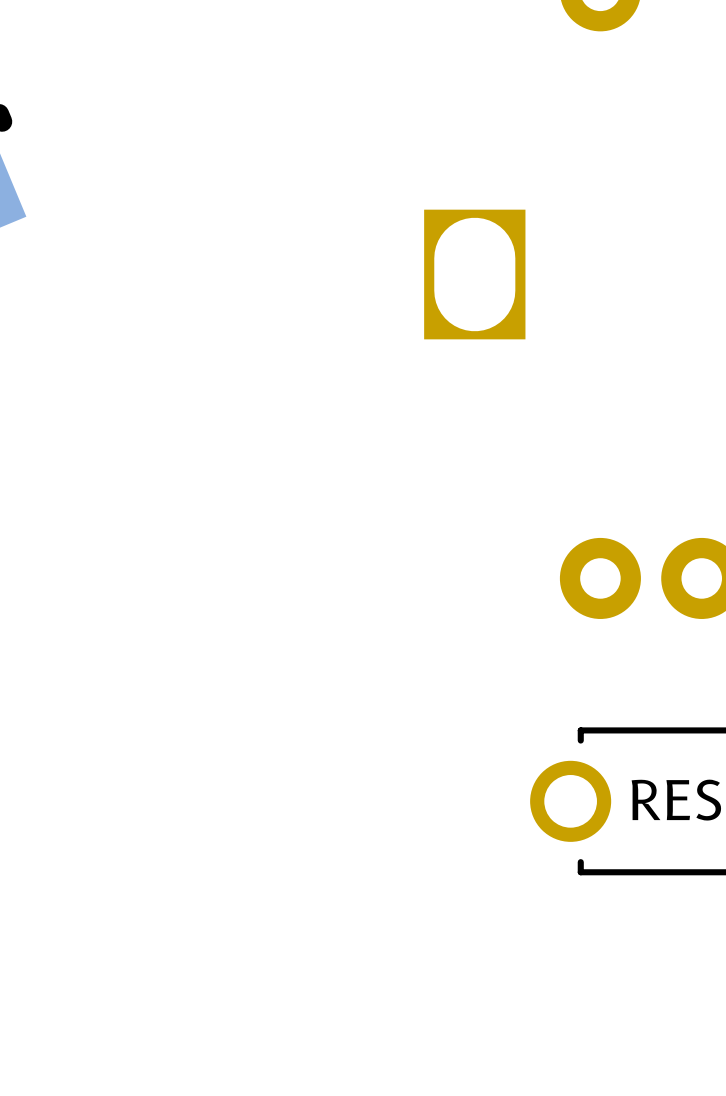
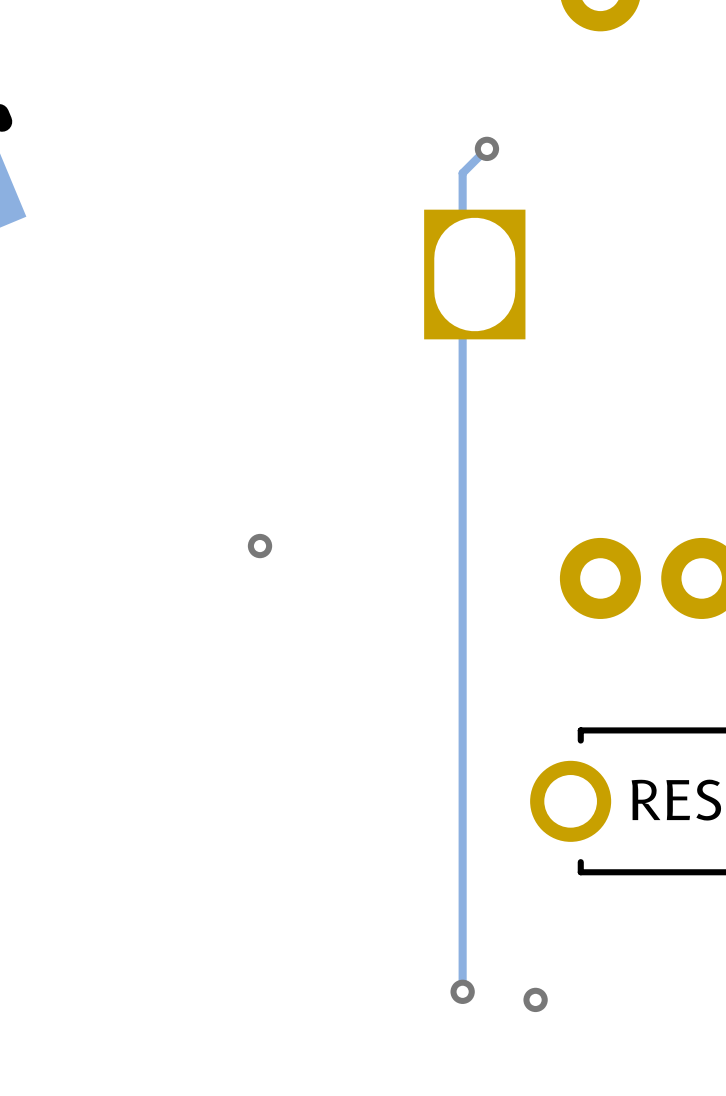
track: none -> (486, 148) (462, 173) (462, 991)
via: none -> (486, 148)
via: none -> (260, 546)
via: none -> (462, 991)
via: none -> (535, 999)

